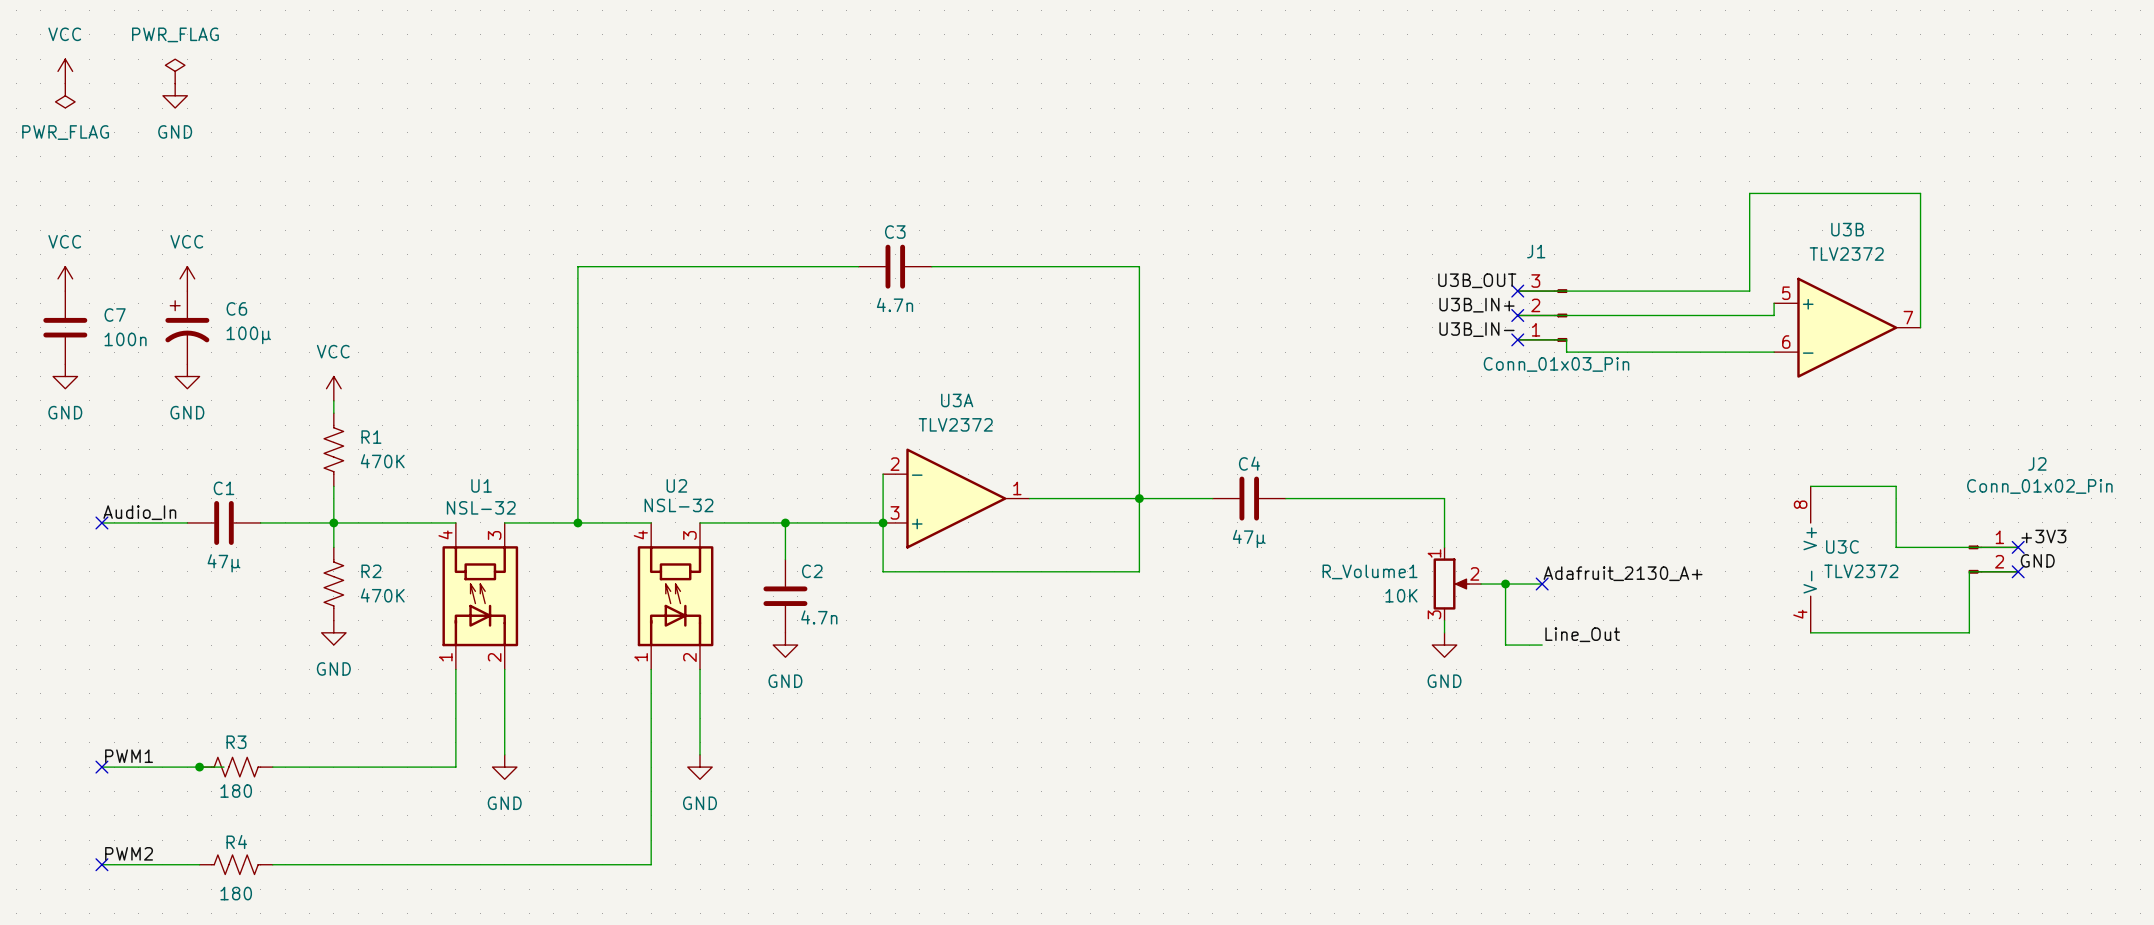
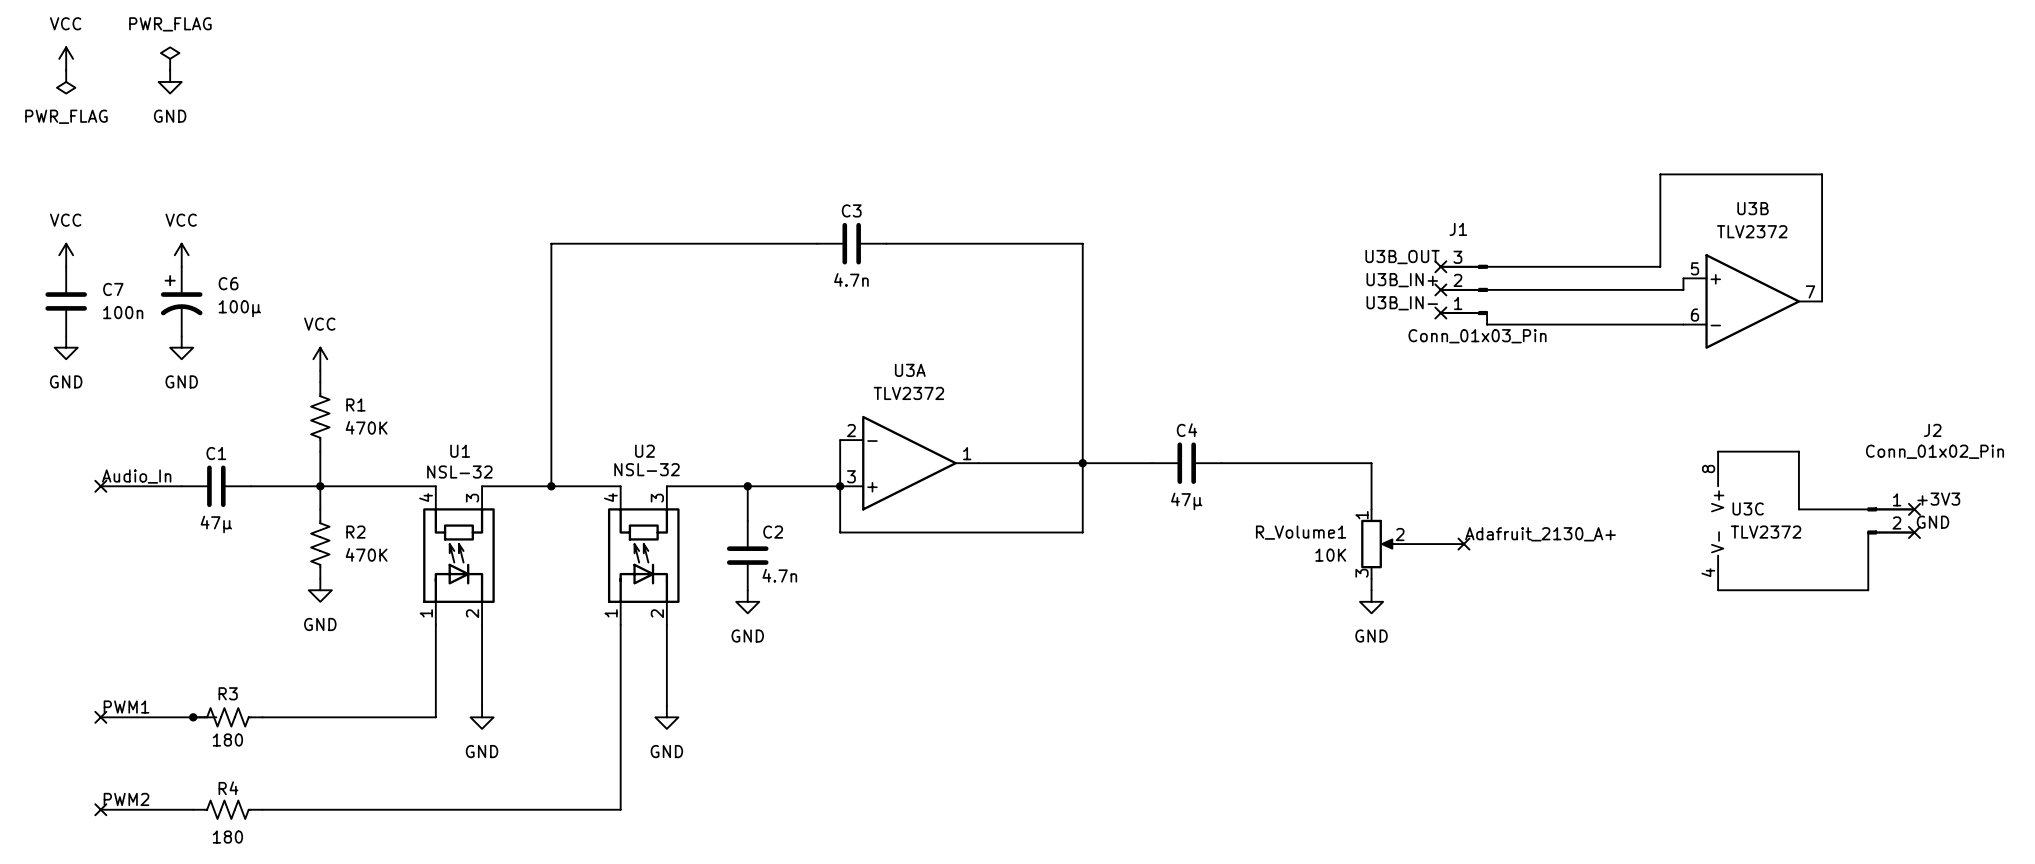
wire: (1505, 584) (1505, 645) (1542, 645) -> none
junction: (1505, 584) -> none
label: Line_Out (1582, 634) -> none

